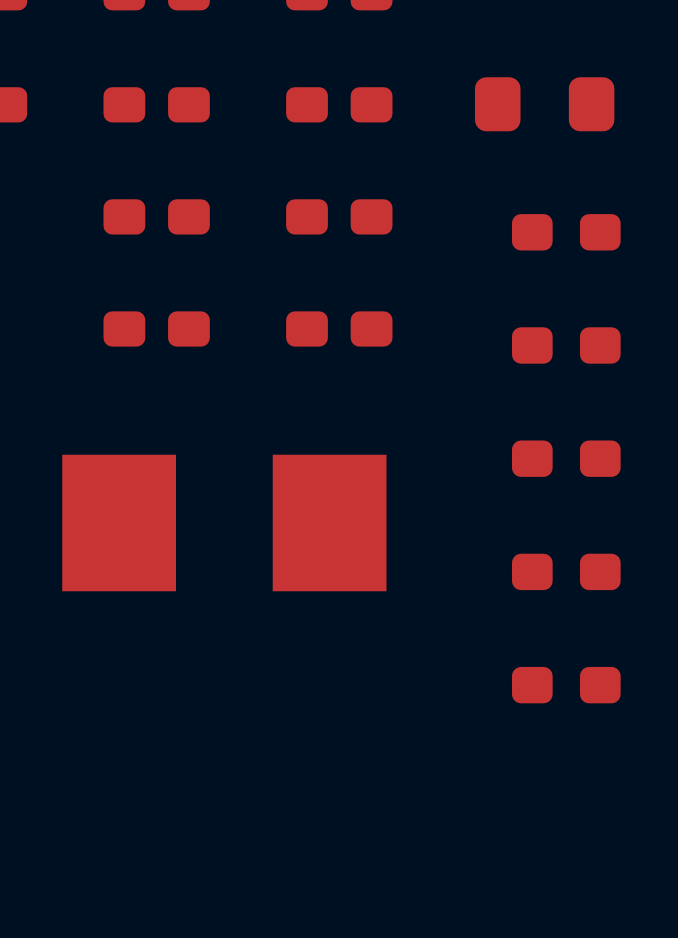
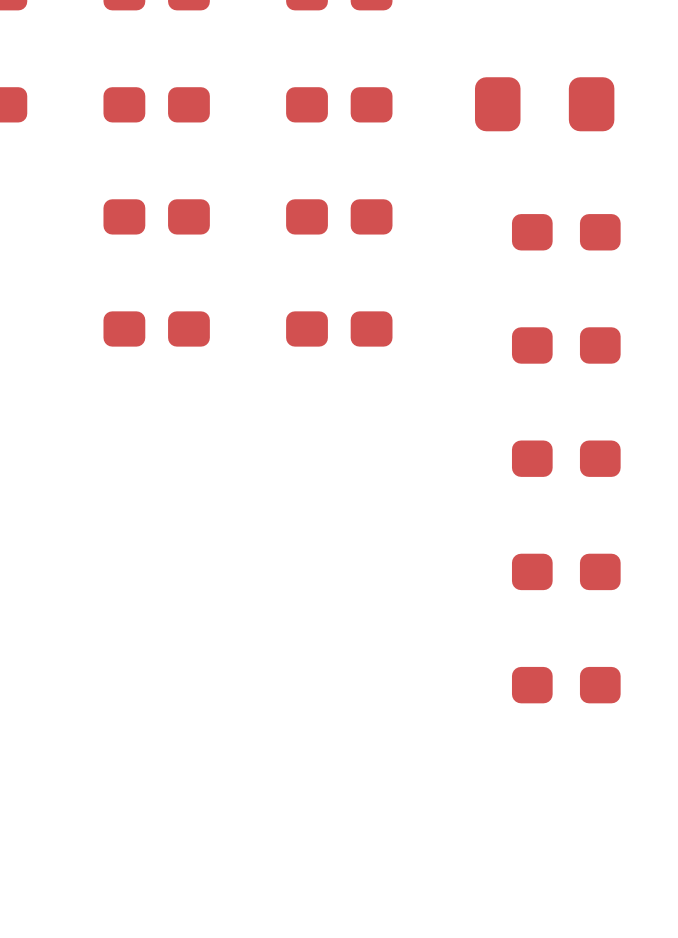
part: (224, 522) -> none

